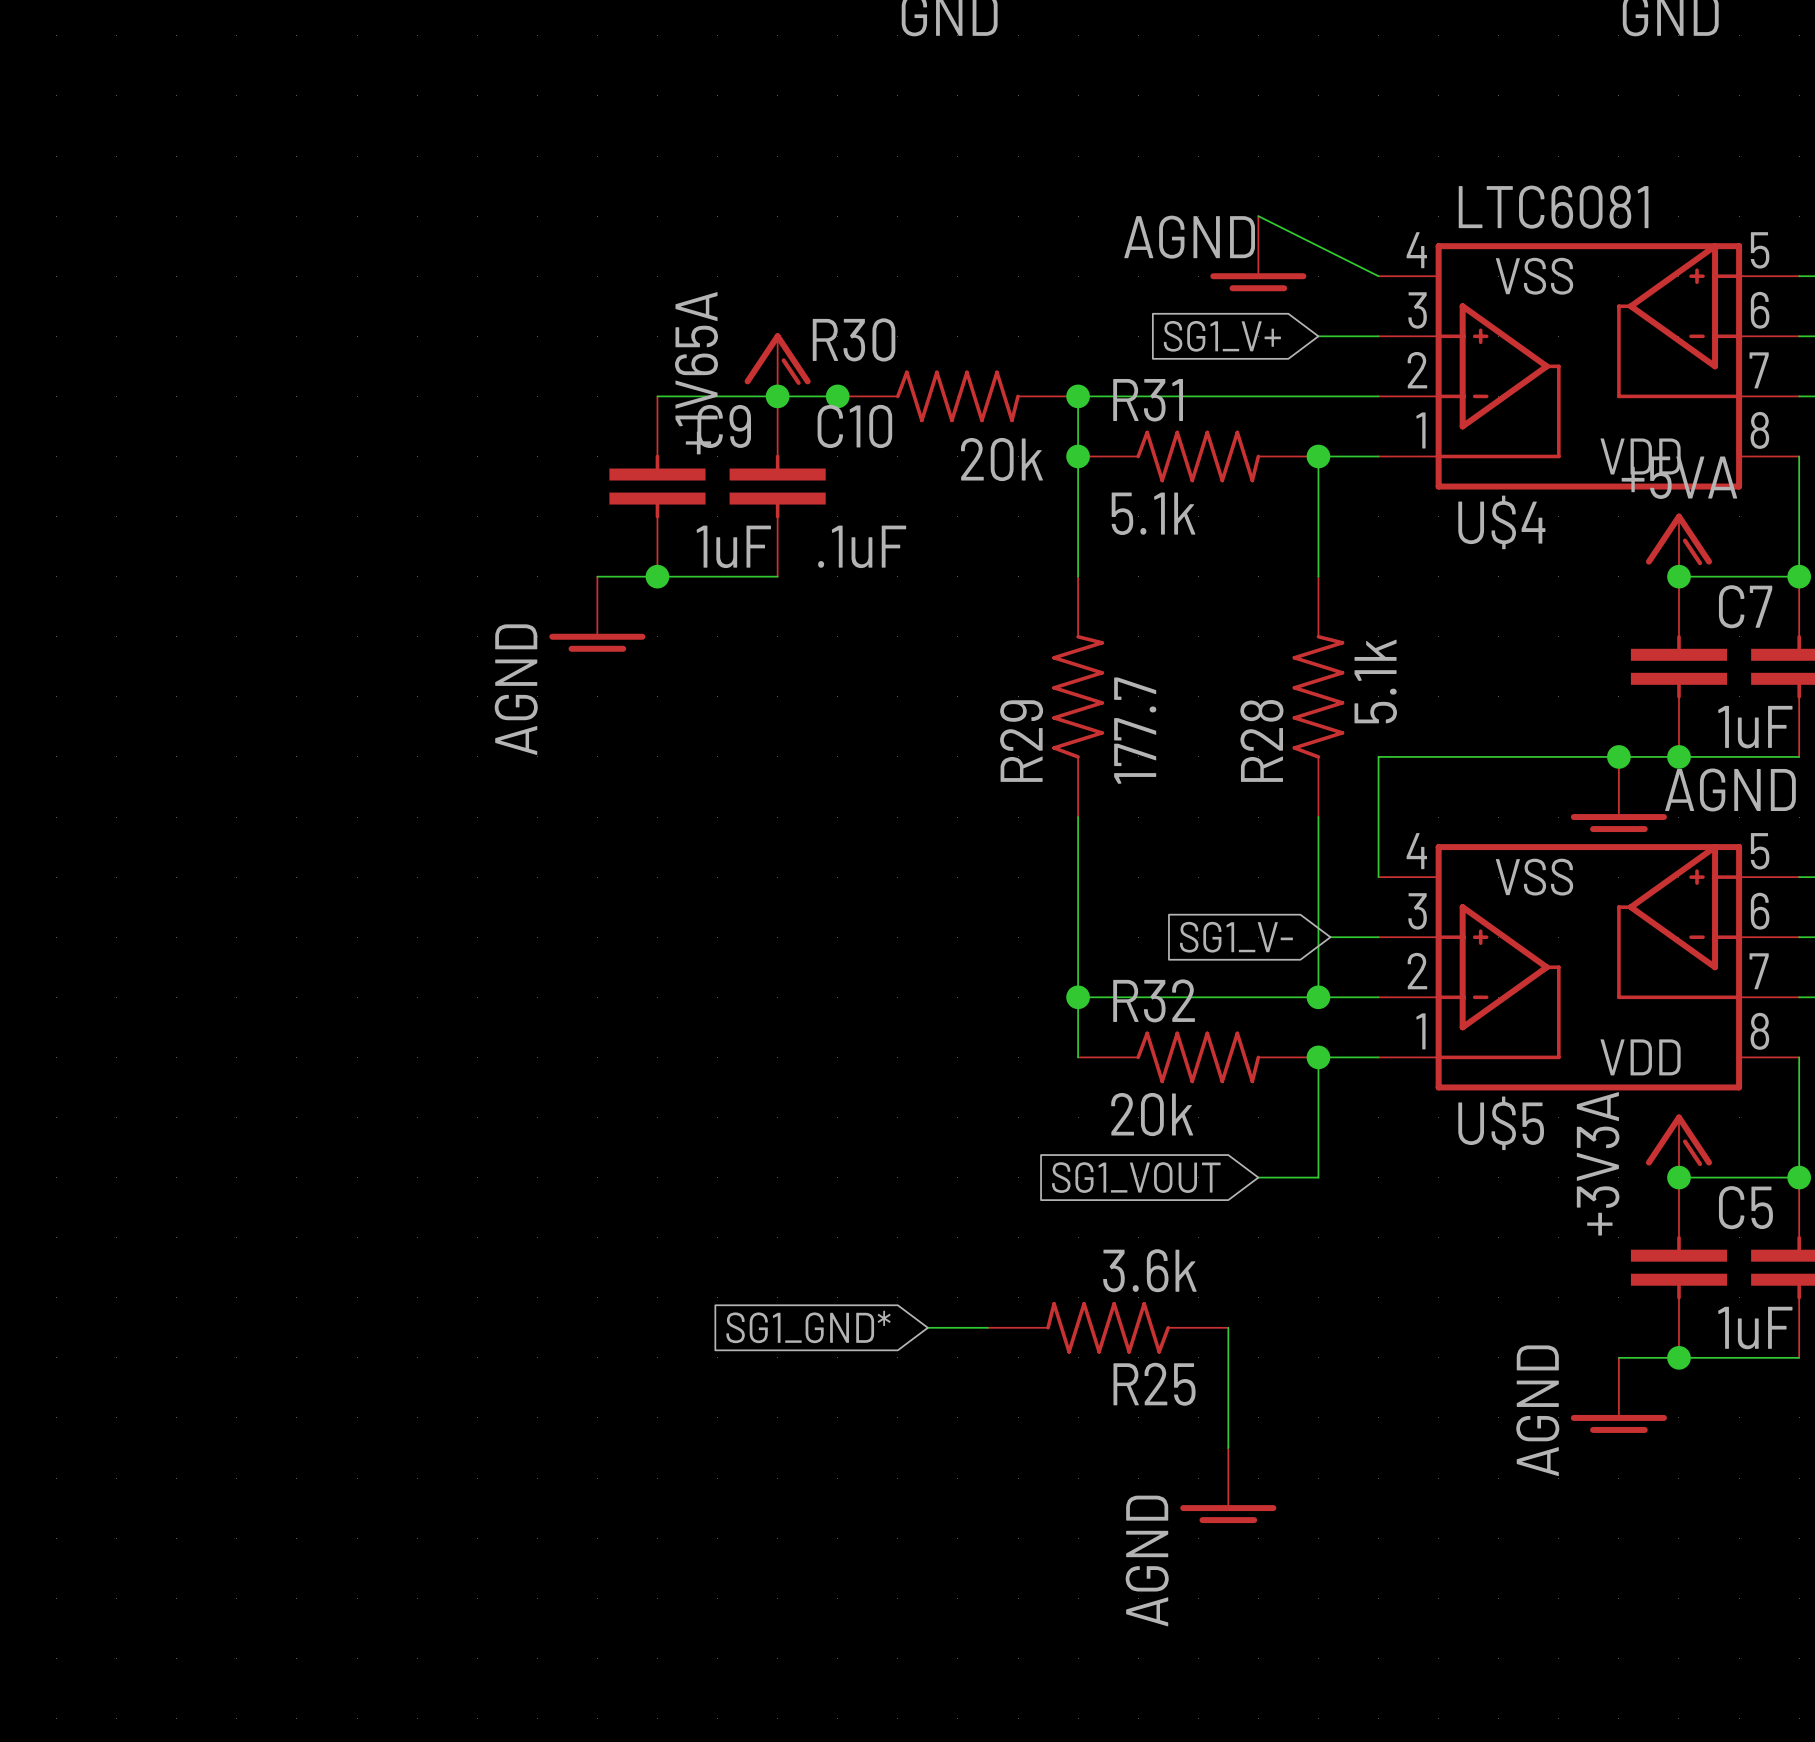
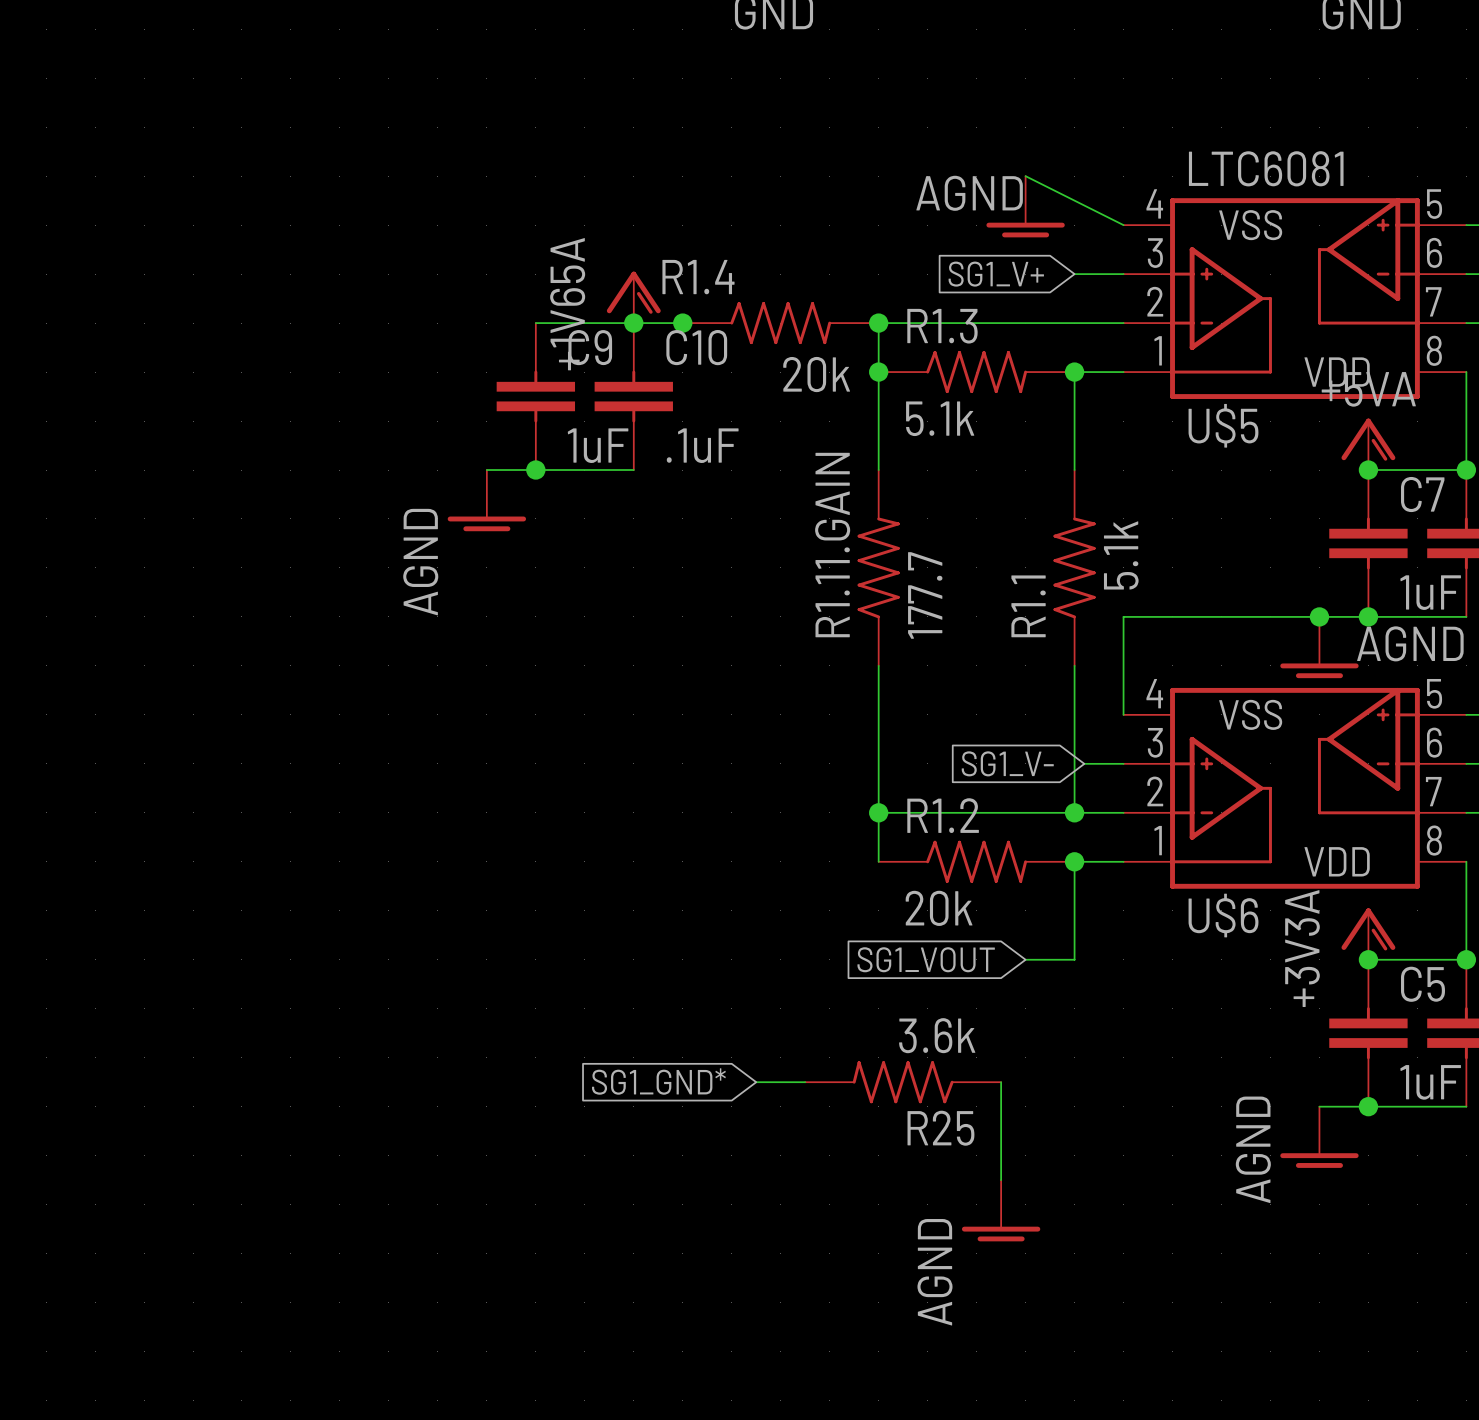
R30 name: R30 (854, 339) -> R1.4 (698, 277)
R31 name: R31 (1148, 400) -> R1.3 (942, 326)
U$4 name: U$4 (1501, 522) -> U$5 (1223, 425)
R28 name: R28 (1261, 740) -> R1.1 (1028, 606)
R29 name: R29 (1021, 741) -> R1.11.GAIN (832, 545)
R32 name: R32 (1154, 1000) -> R1.2 (943, 815)
U$5 name: U$5 (1501, 1123) -> U$6 (1223, 915)

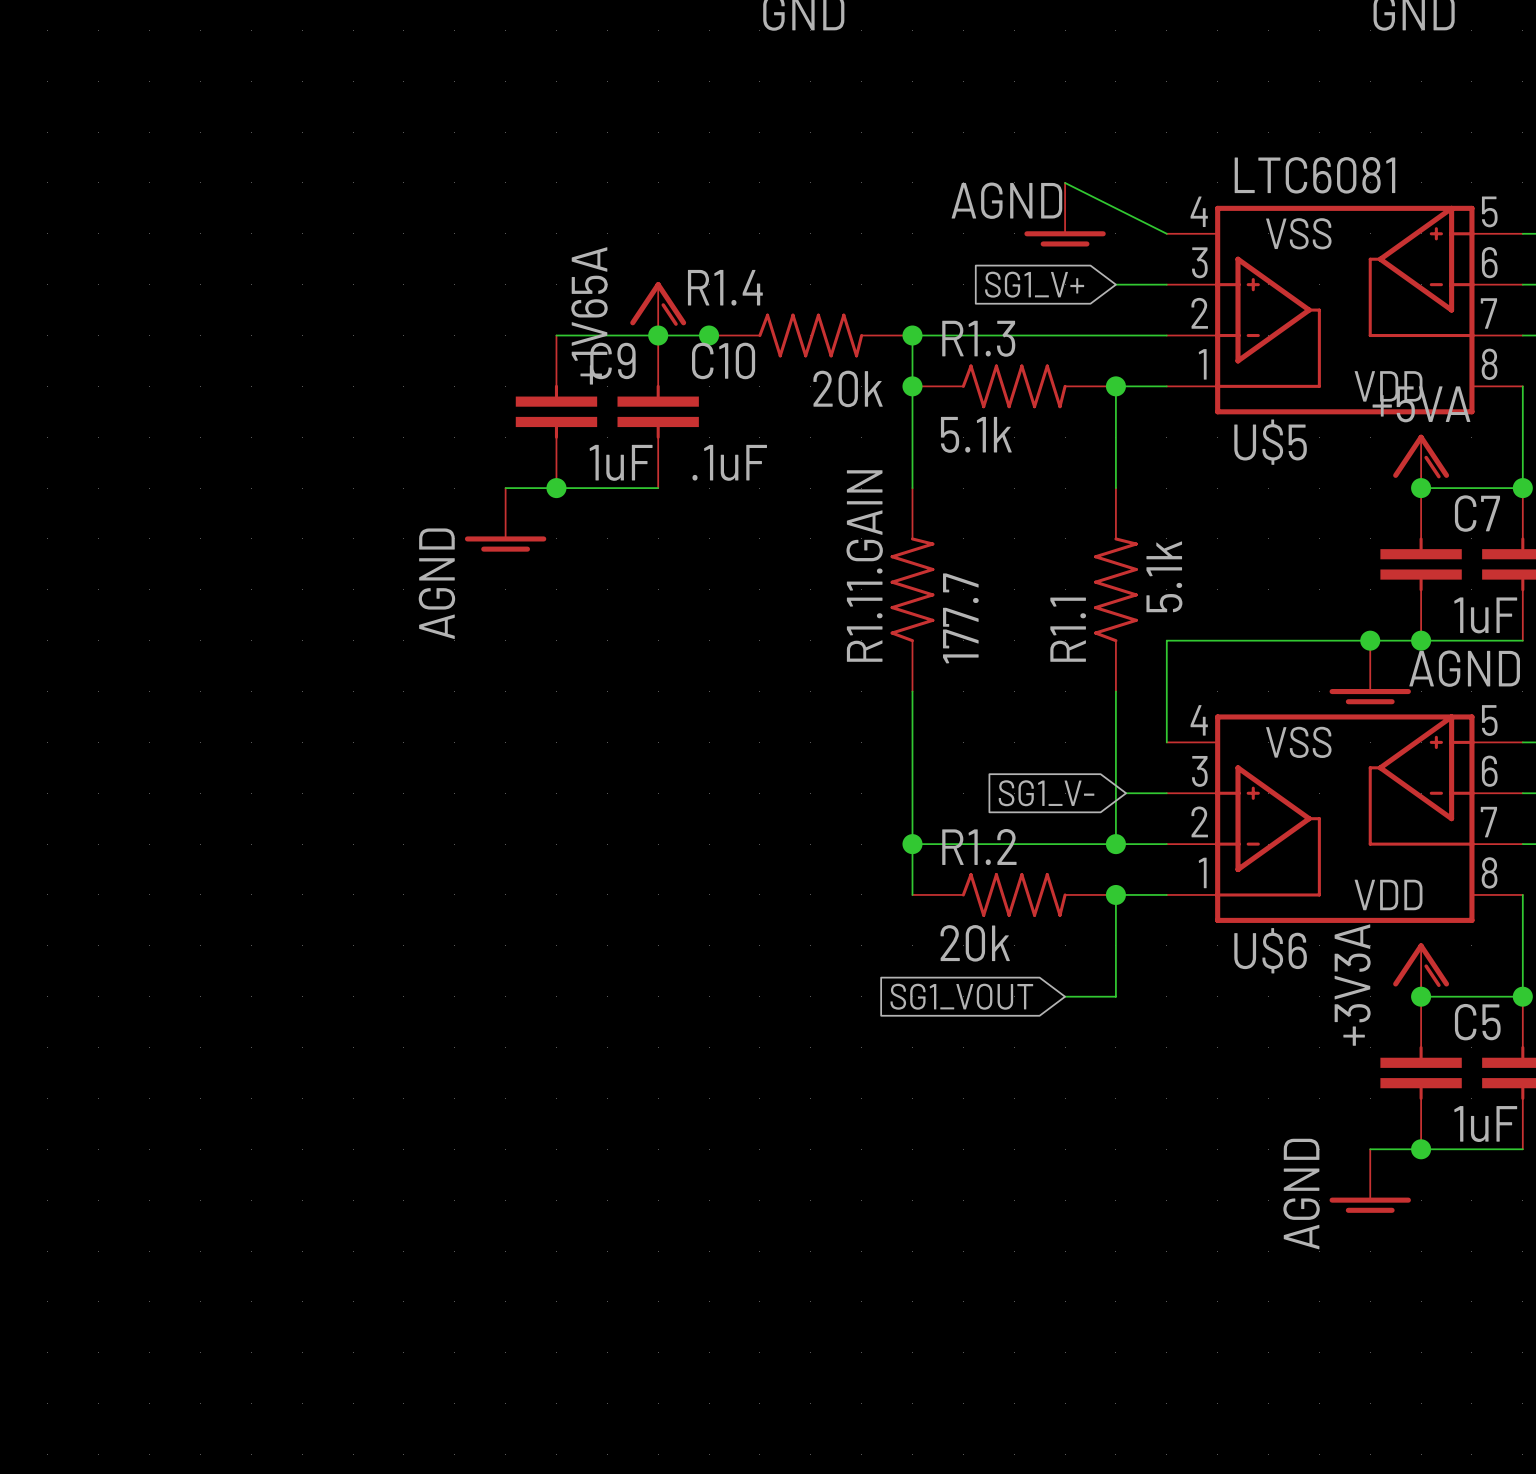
global label: SG1_GND* (658, 1081) -> none
wire: (756, 1082) (805, 1082) -> none
R25: 3.6k (903, 1082) -> none
wire: (1001, 1082) (1001, 1180) -> none
power symbol: AGND (1001, 1210) -> none

